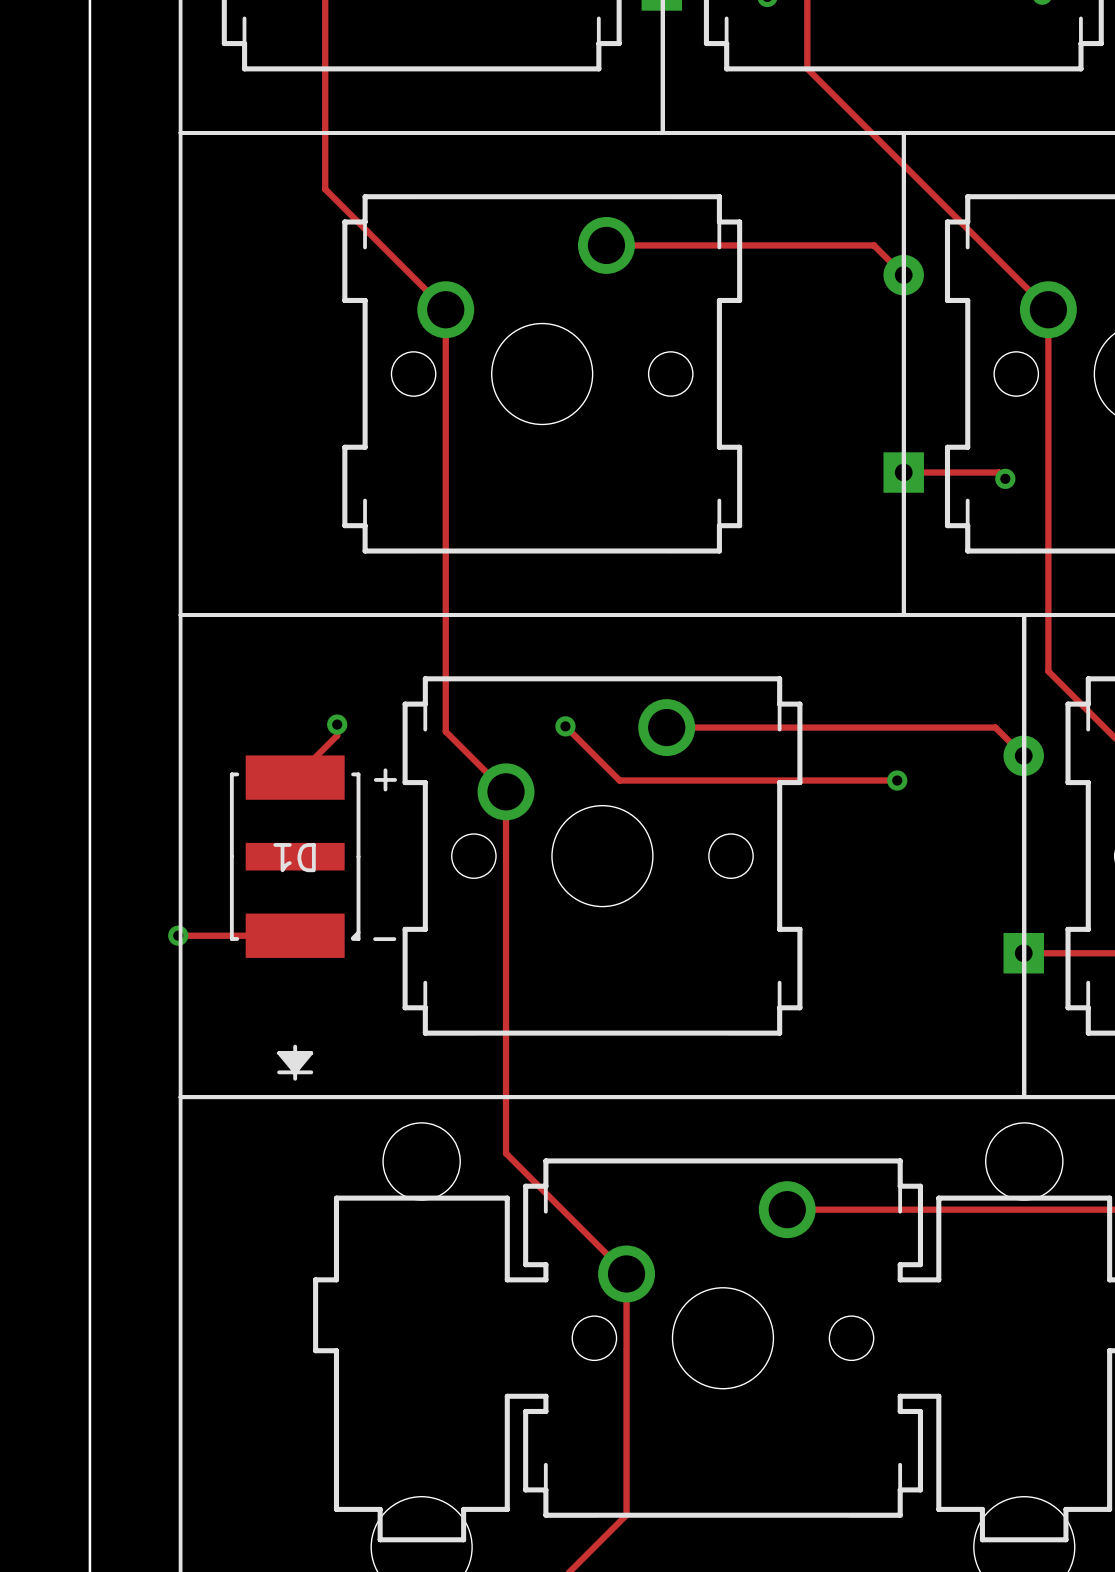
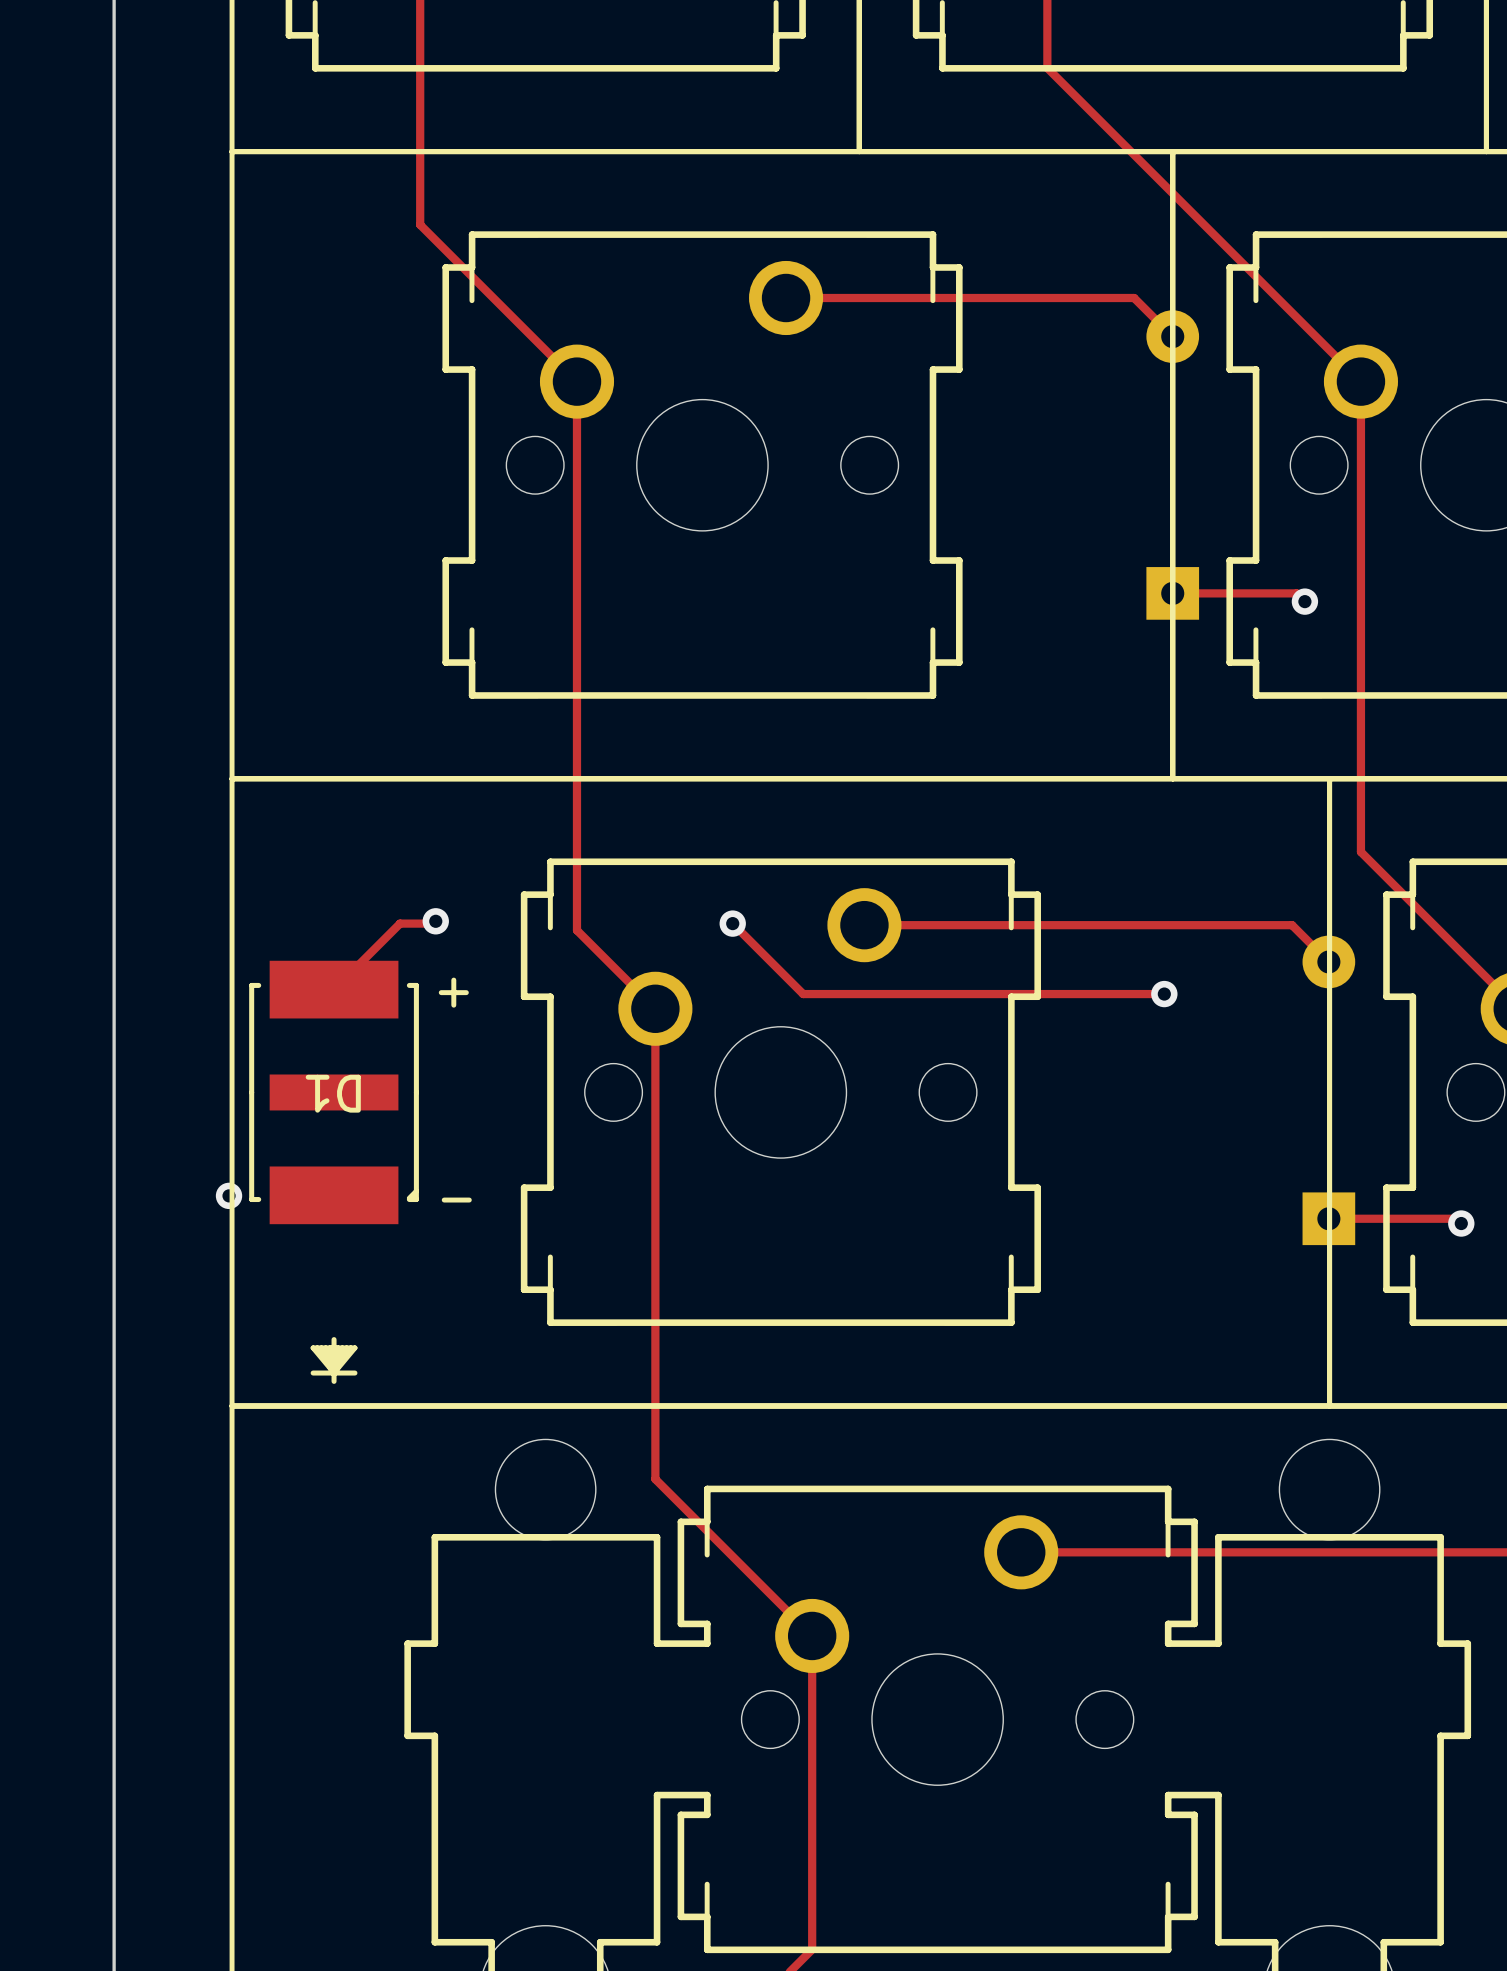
track: (337, 724) (337, 735) (295, 777) -> none
track: none -> (438, 923) (400, 923) (334, 989)
text position: + (385, 779) -> + (453, 992)
D1 position: (295, 918) -> (334, 1172)
track: (178, 935) (295, 935) -> none
text position: - (384, 939) -> - (456, 1200)

